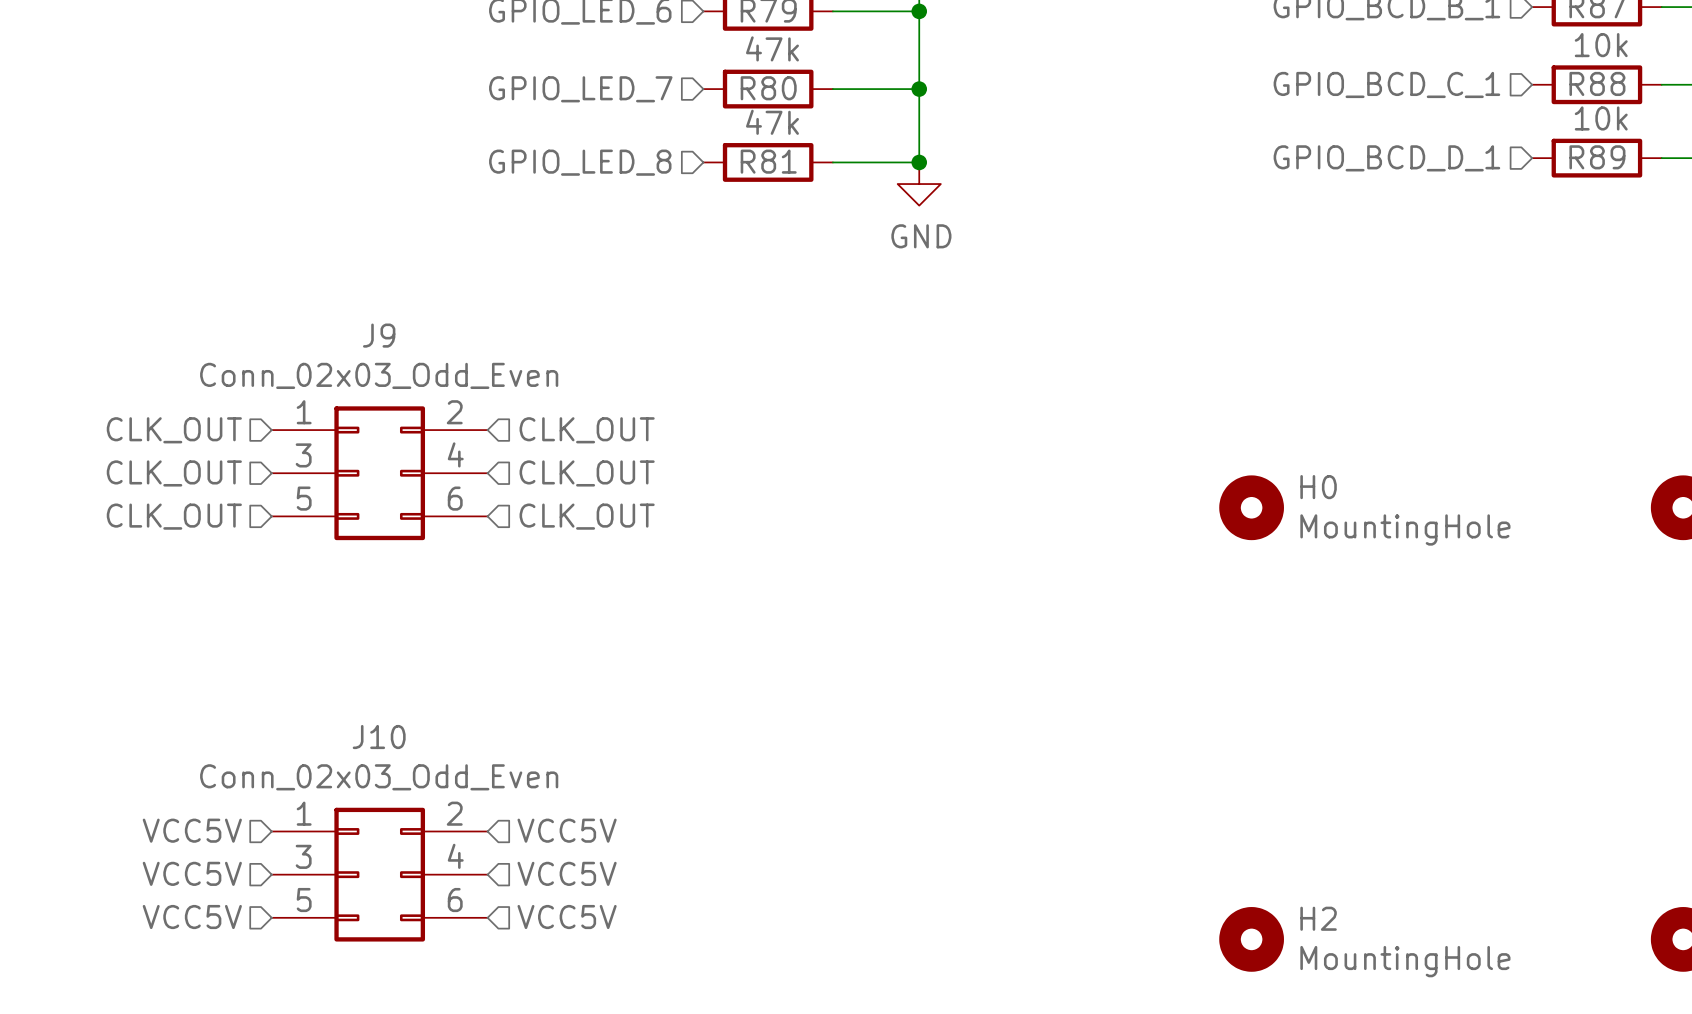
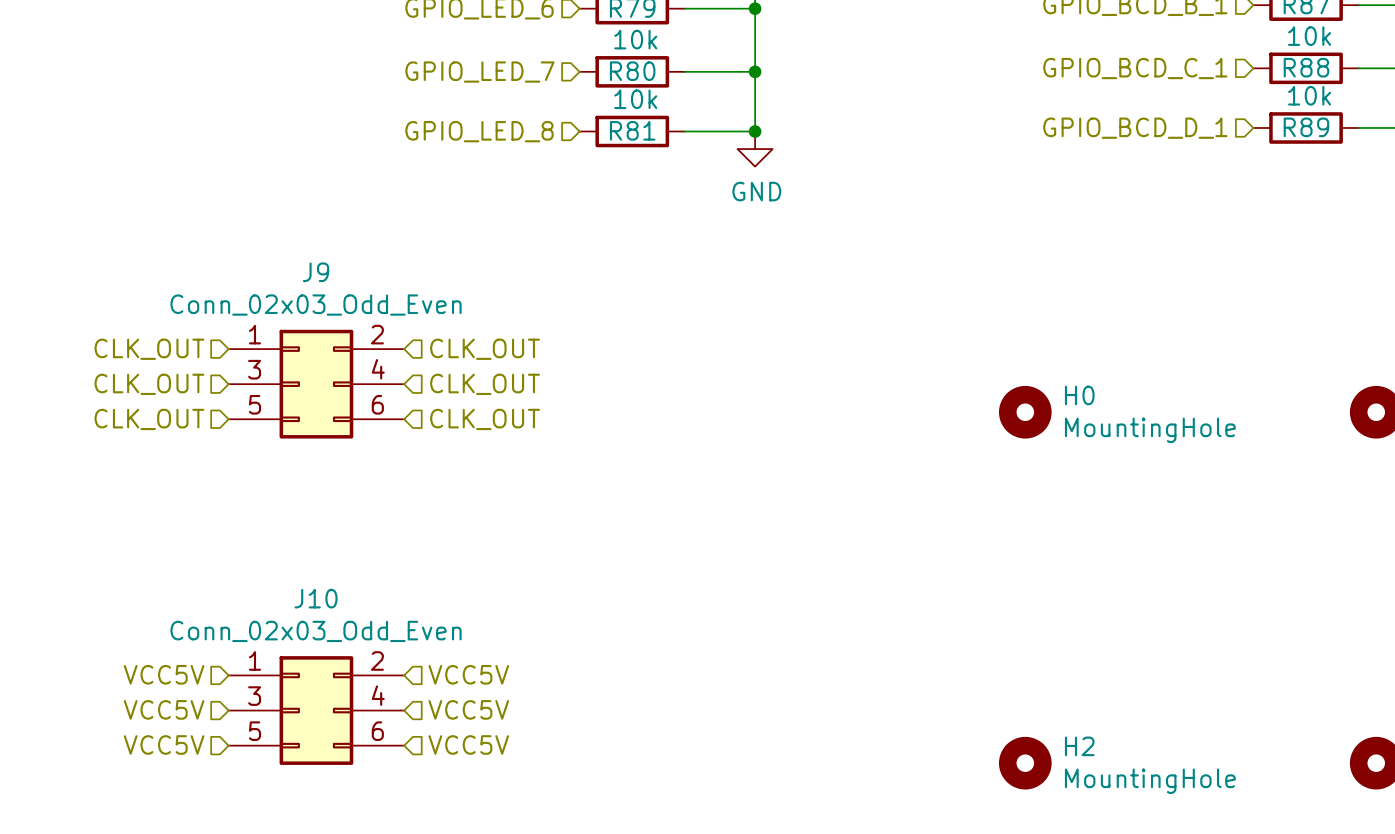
R80 value: 47k (772, 48) -> 10k (635, 39)
R81 value: 47k (772, 122) -> 10k (635, 99)

